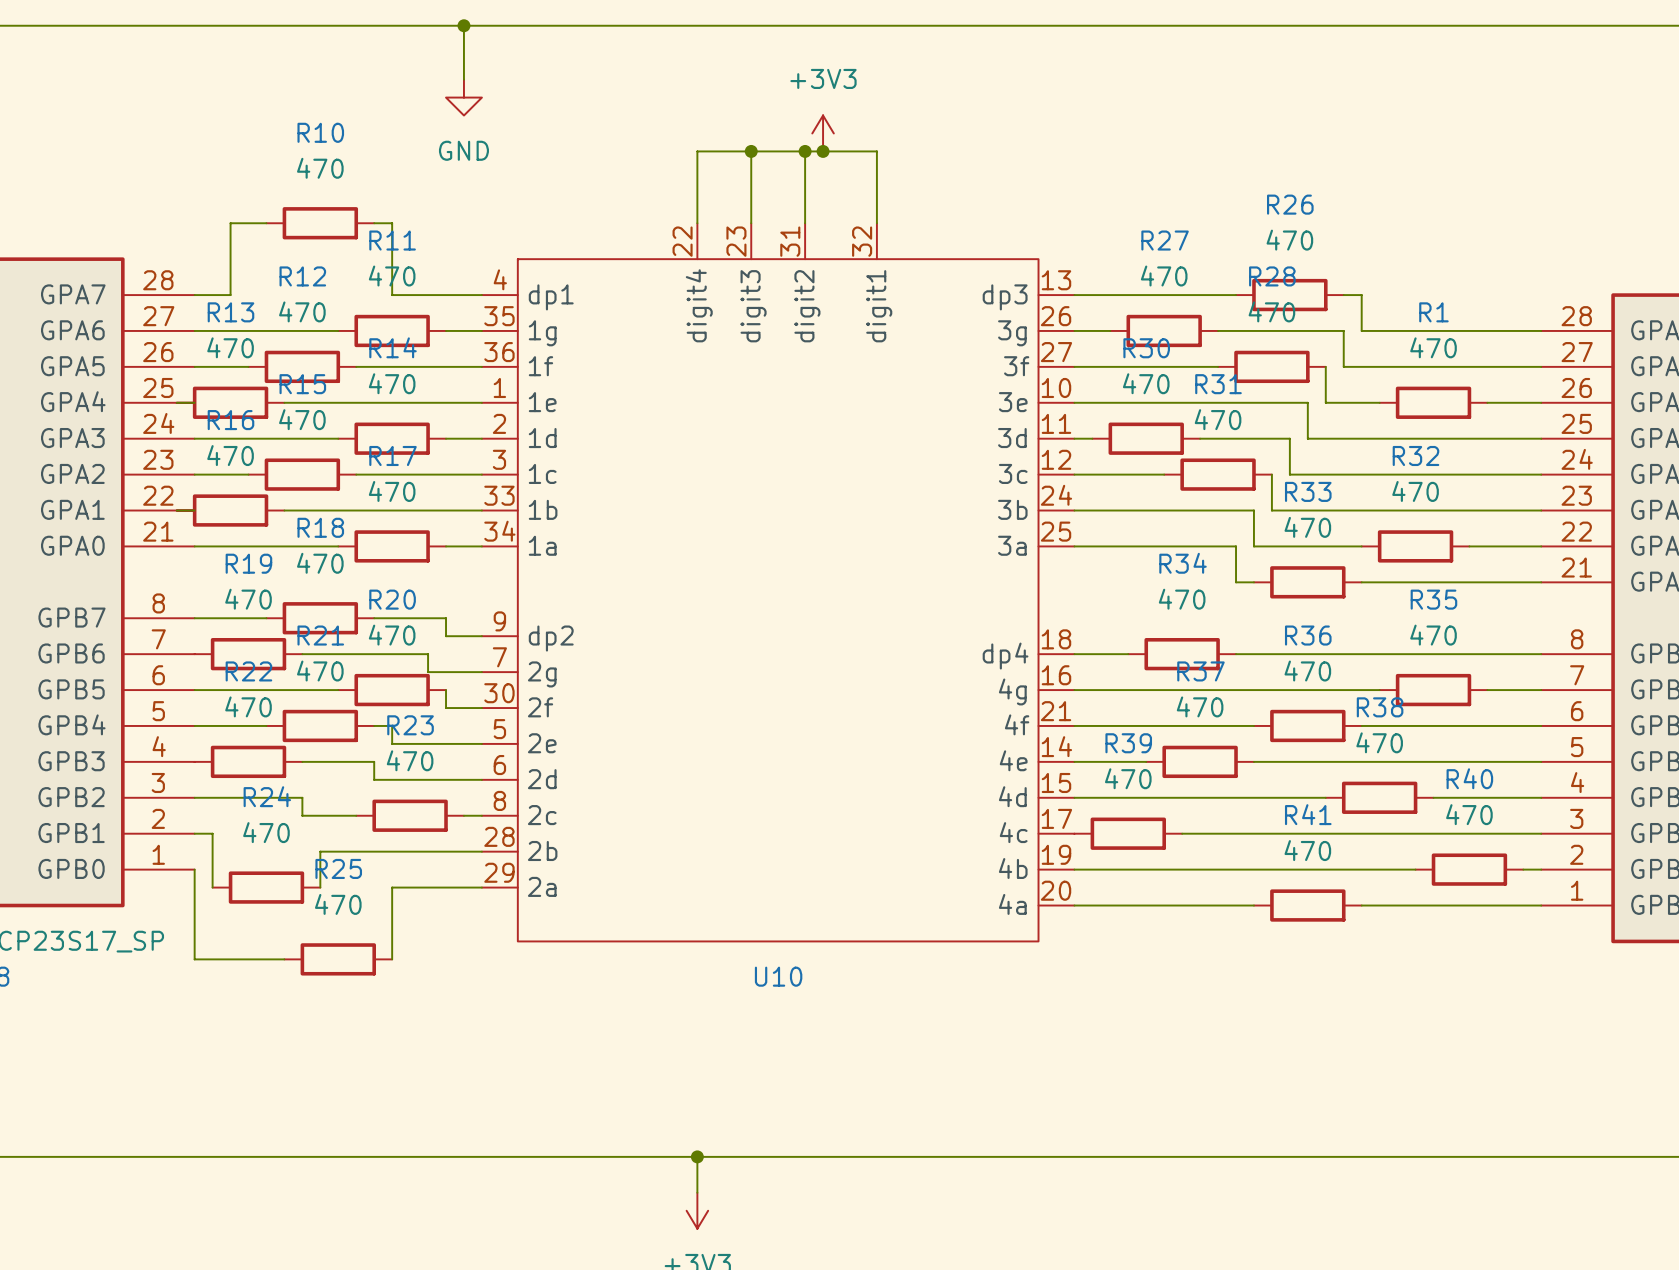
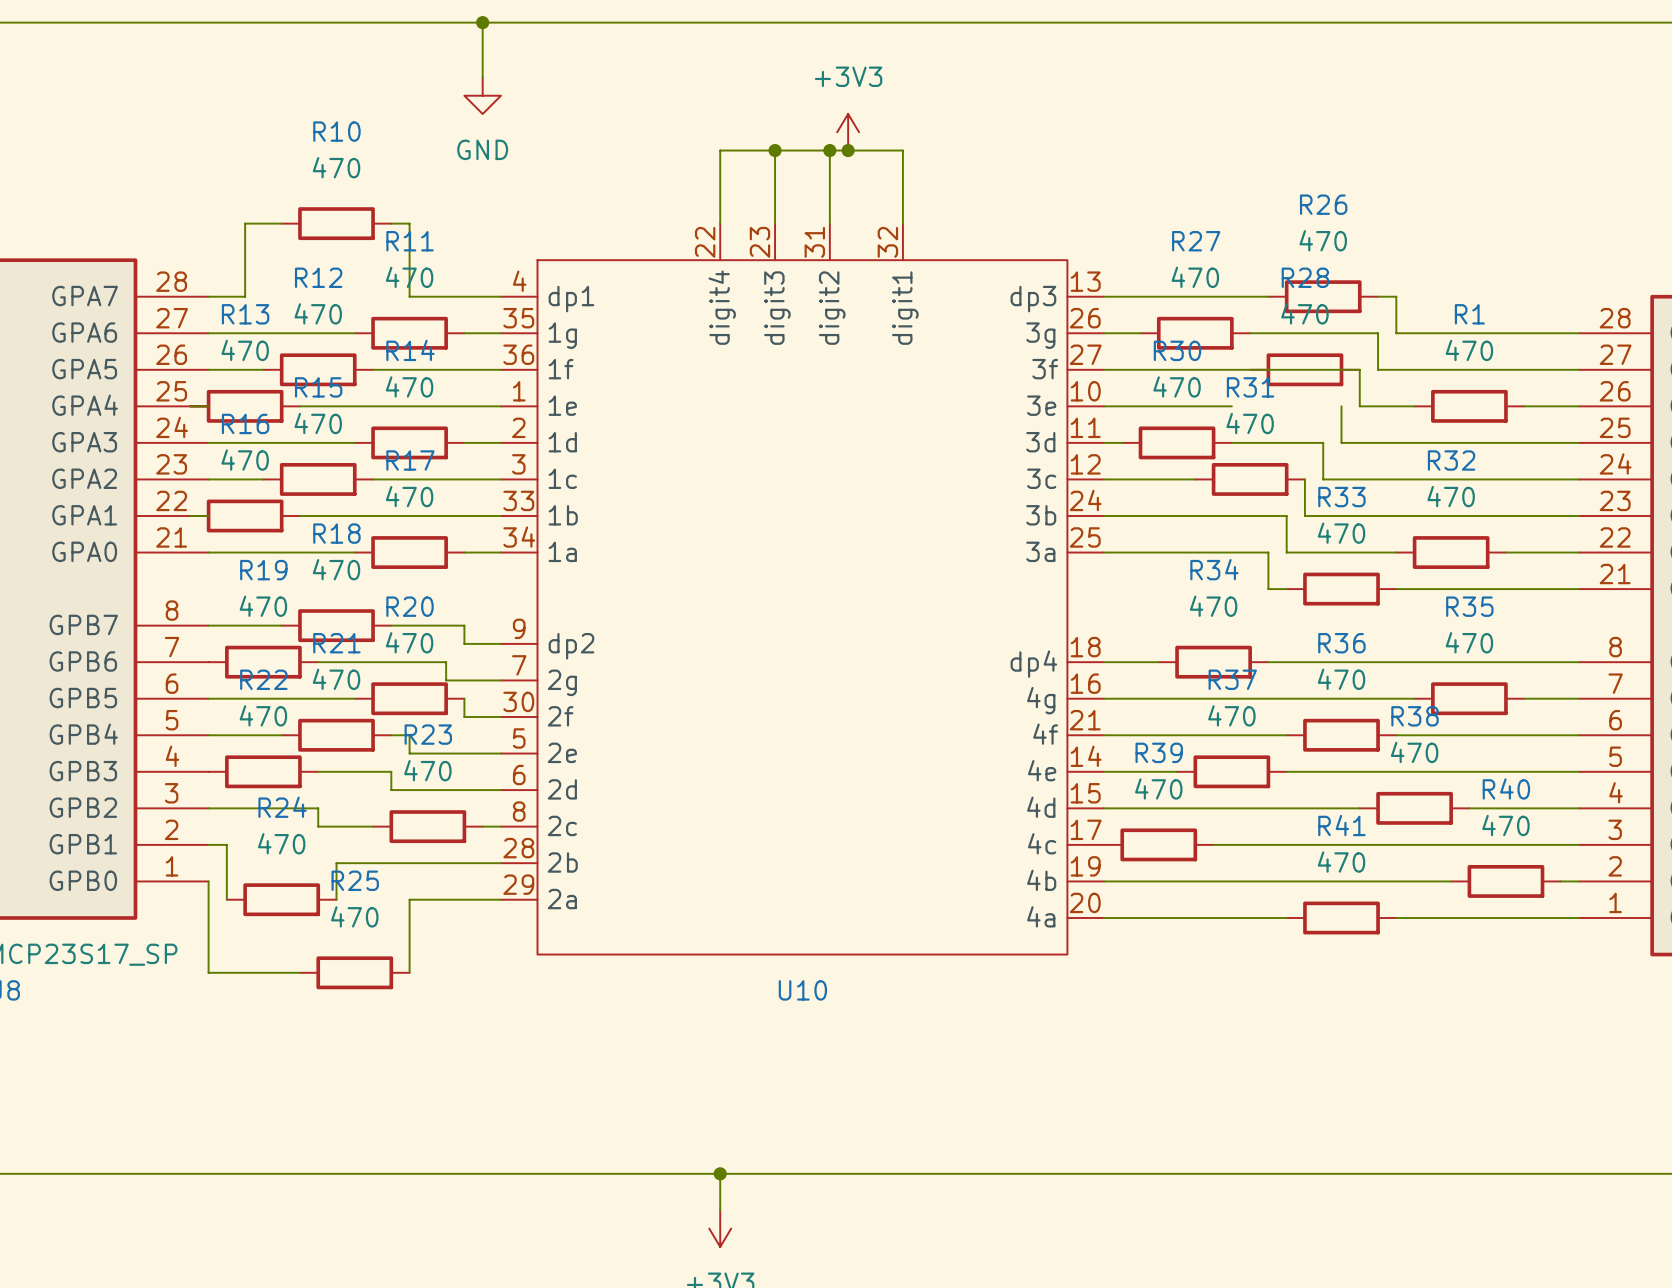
wire: (1200, 402) (1307, 402) -> (1250, 369) (1359, 369)

